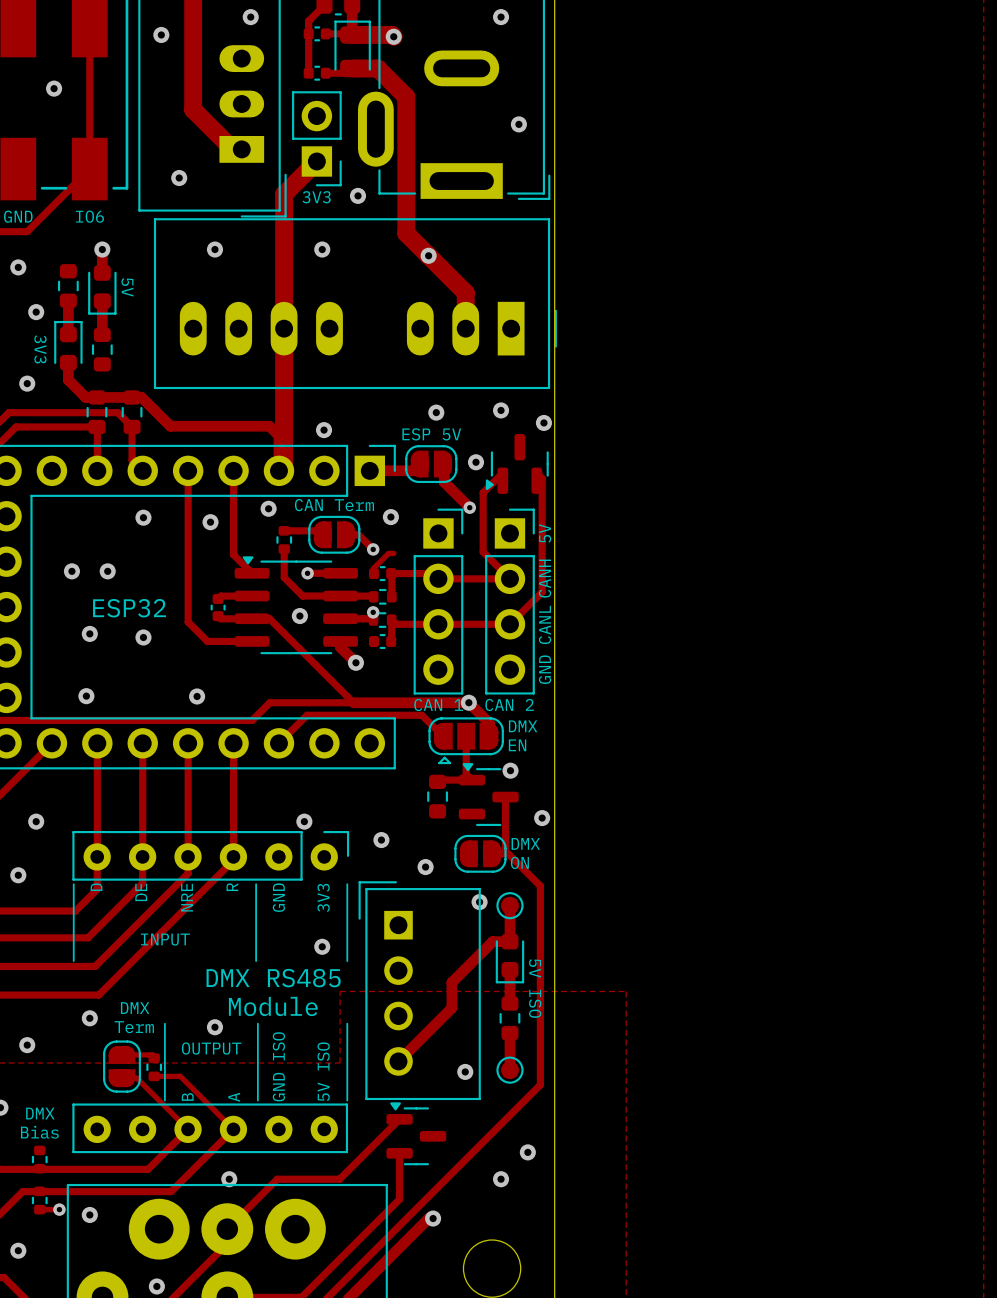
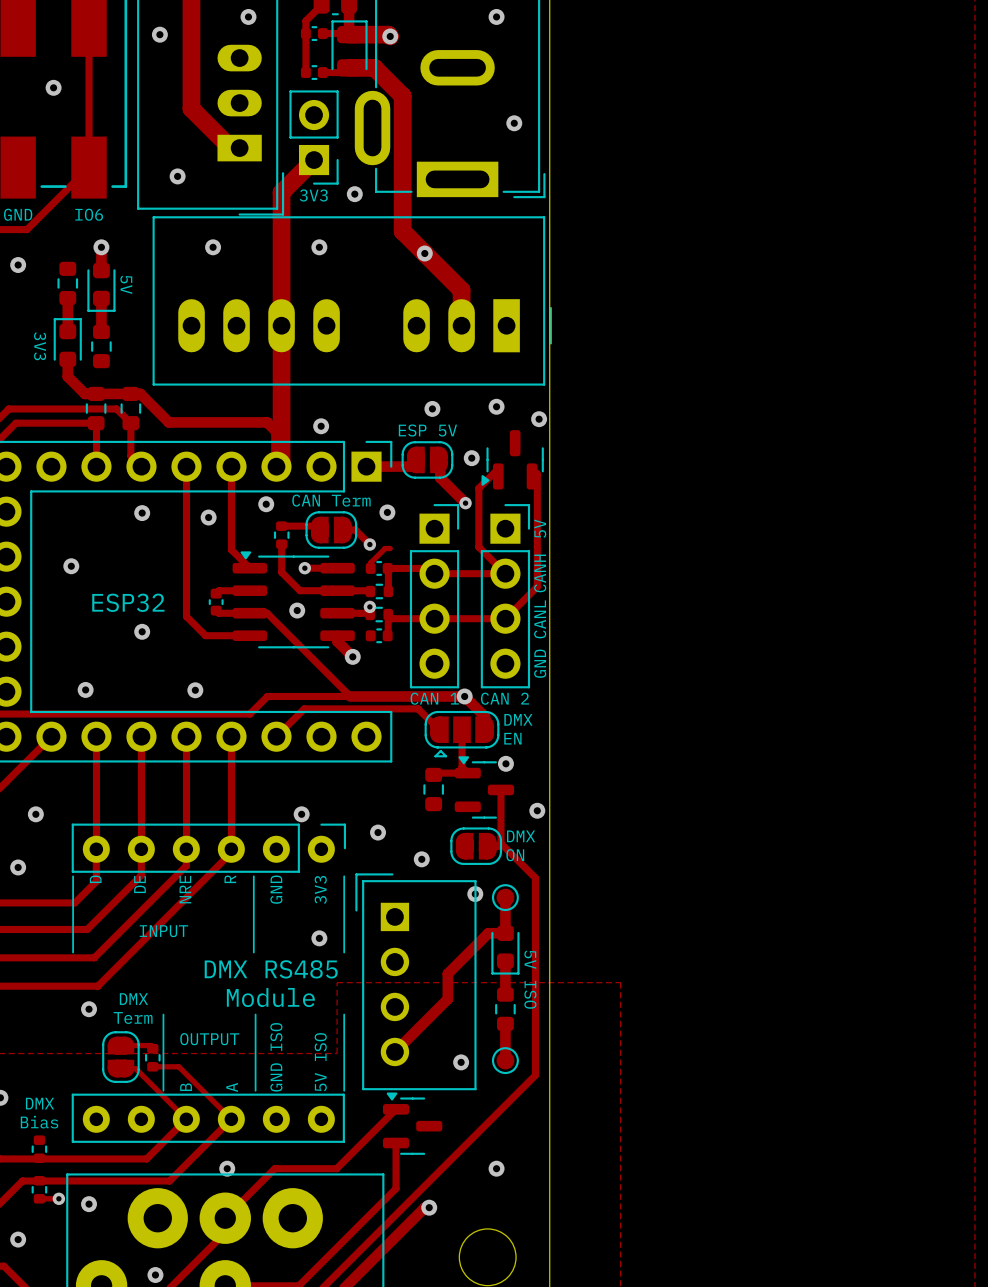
via: (36, 312) -> none
via: (27, 383) -> none
via: (107, 571) -> none
via: (89, 633) -> none
via: (214, 1027) -> none
via: (27, 1045) -> none
via: (527, 1152) -> none

